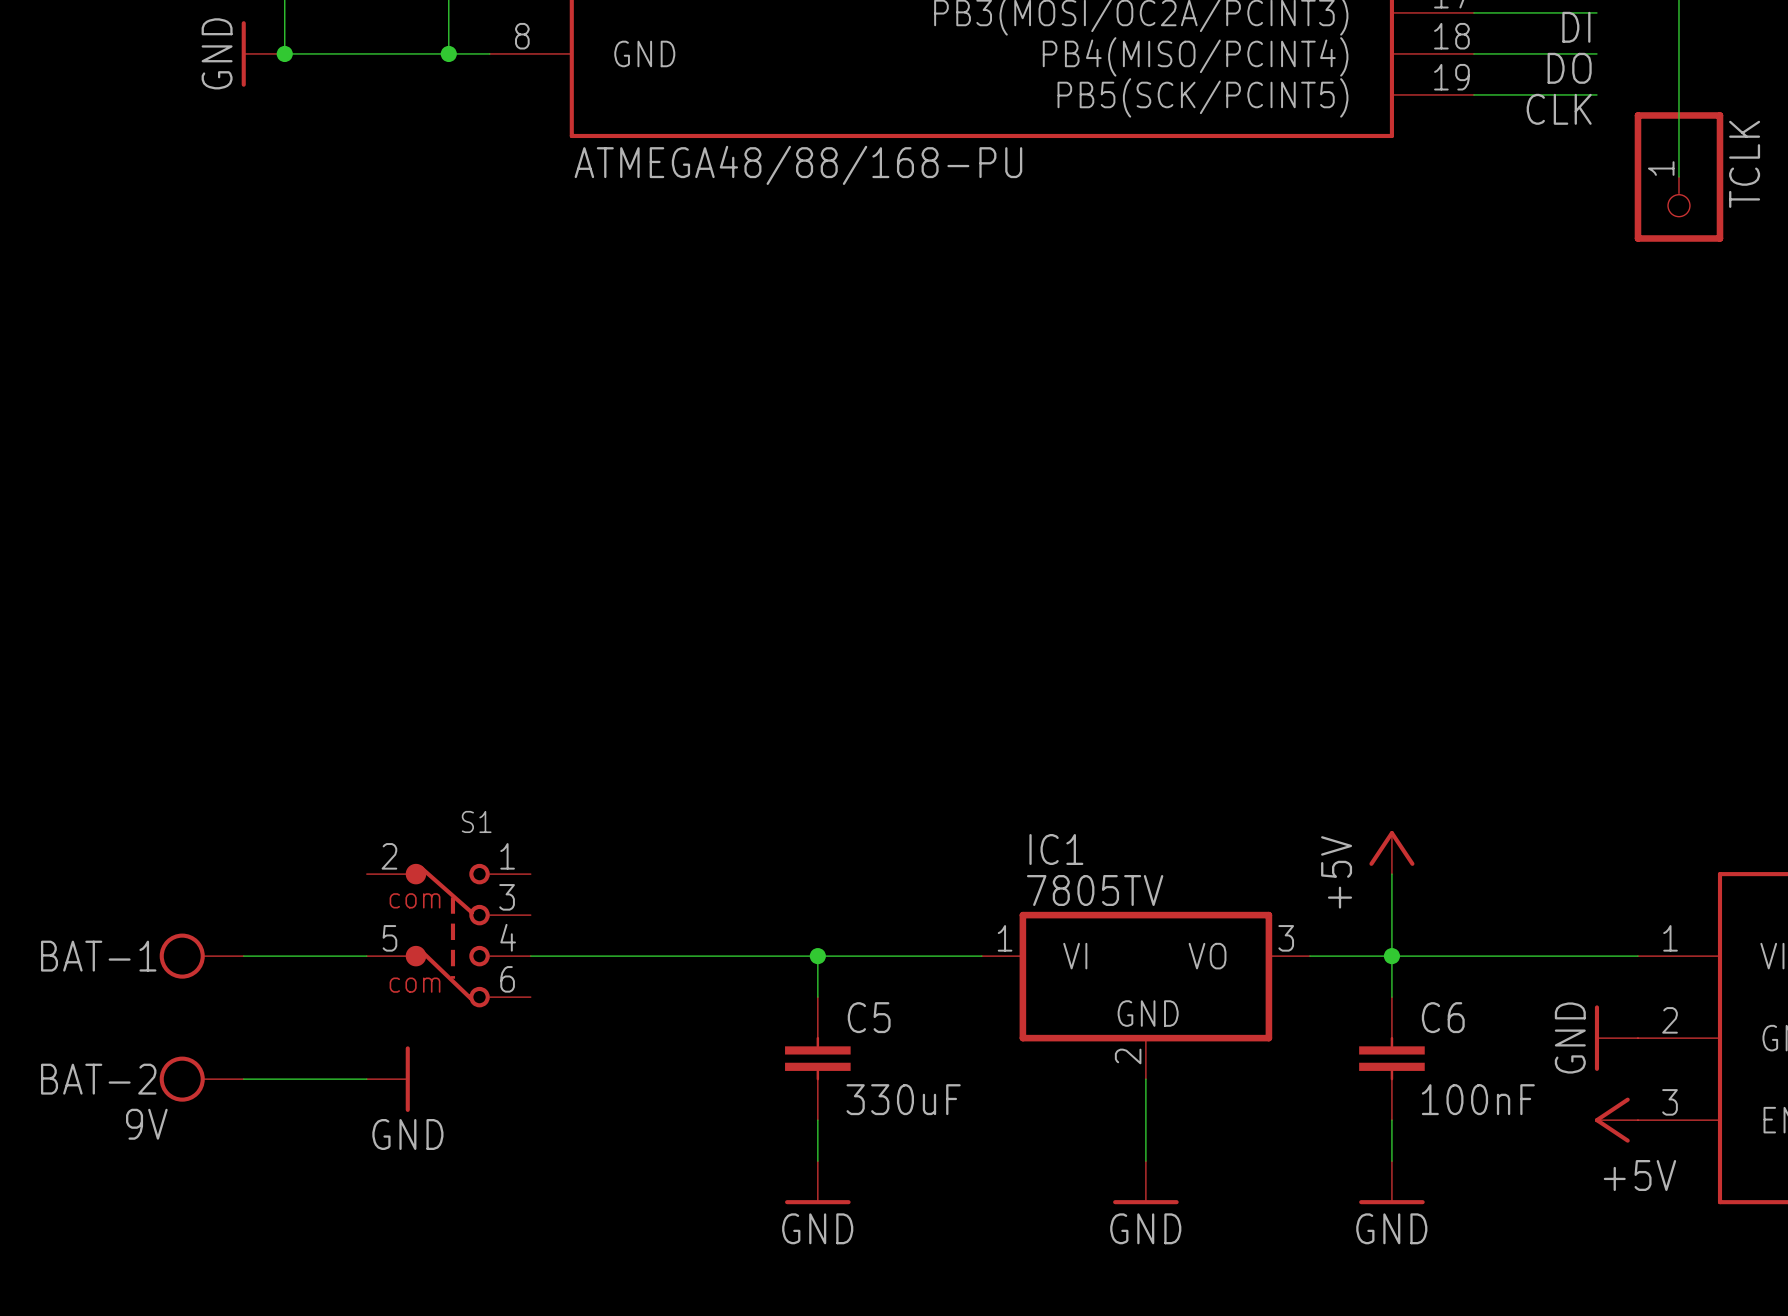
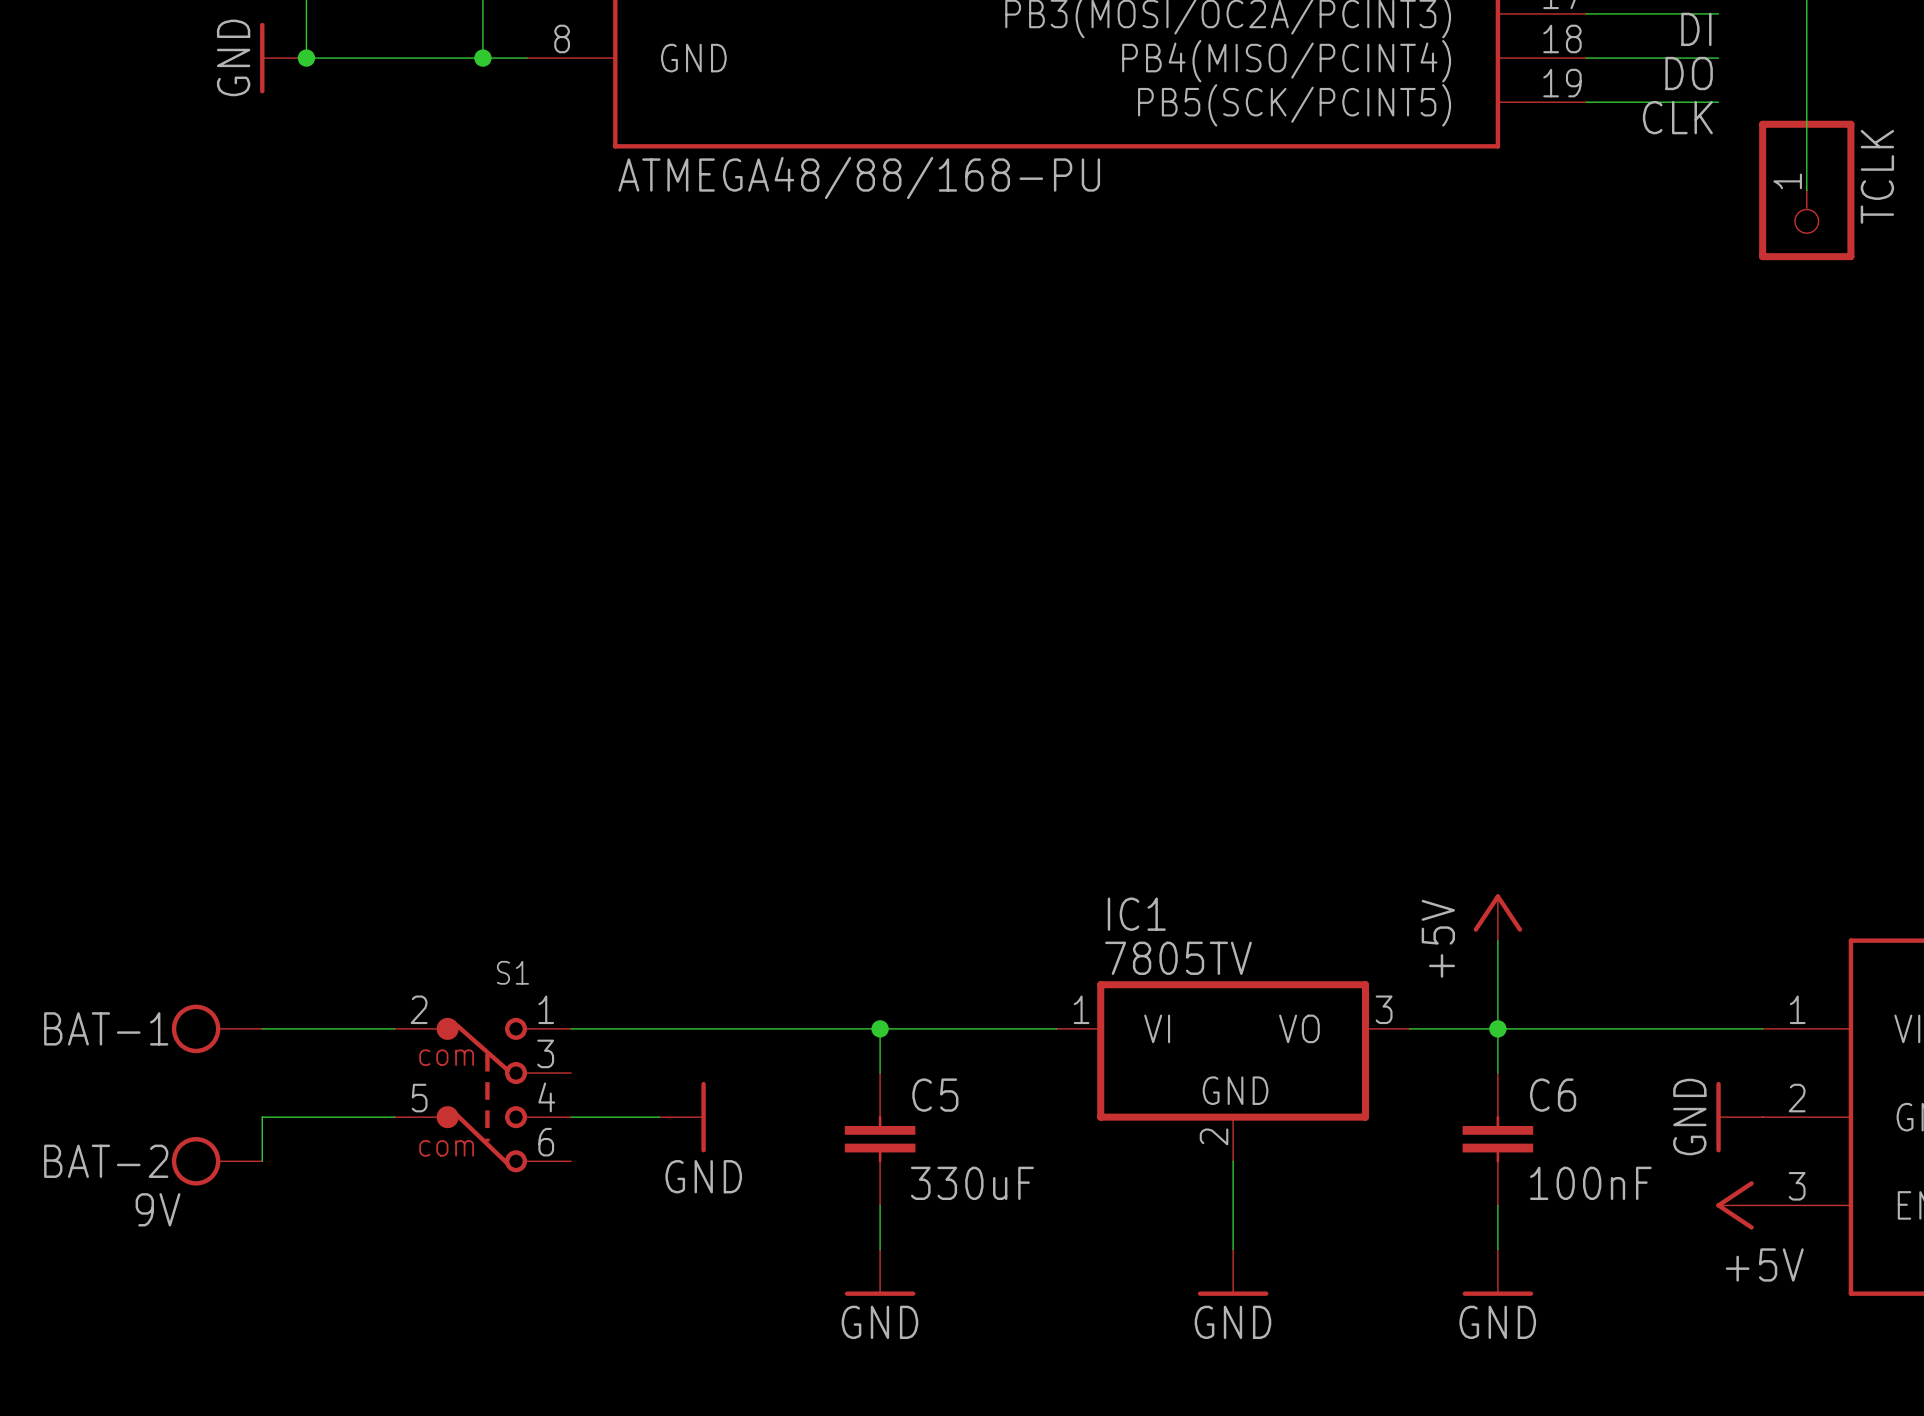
S1 position: (448, 935) -> (482, 1095)
wire: none -> (571, 1117) (659, 1117)
wire: (243, 1079) (366, 1079) -> (262, 1161) (262, 1117) (394, 1117)
power symbol position: GND (388, 1079) -> GND (682, 1117)

